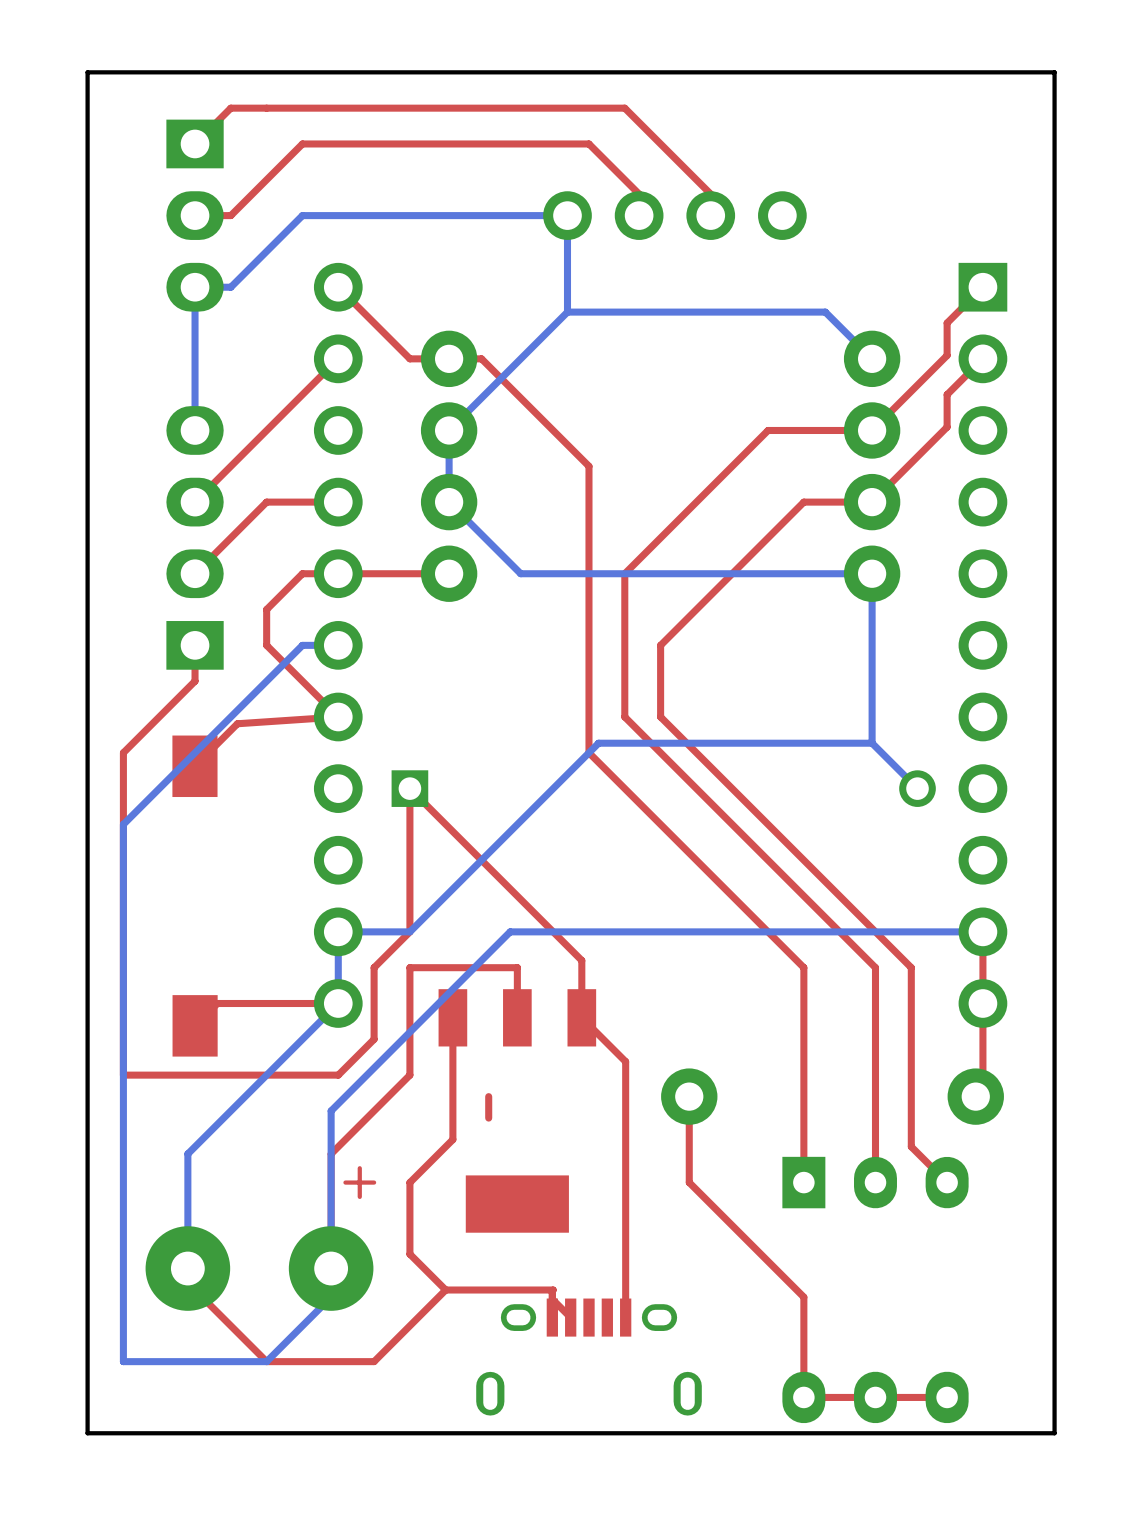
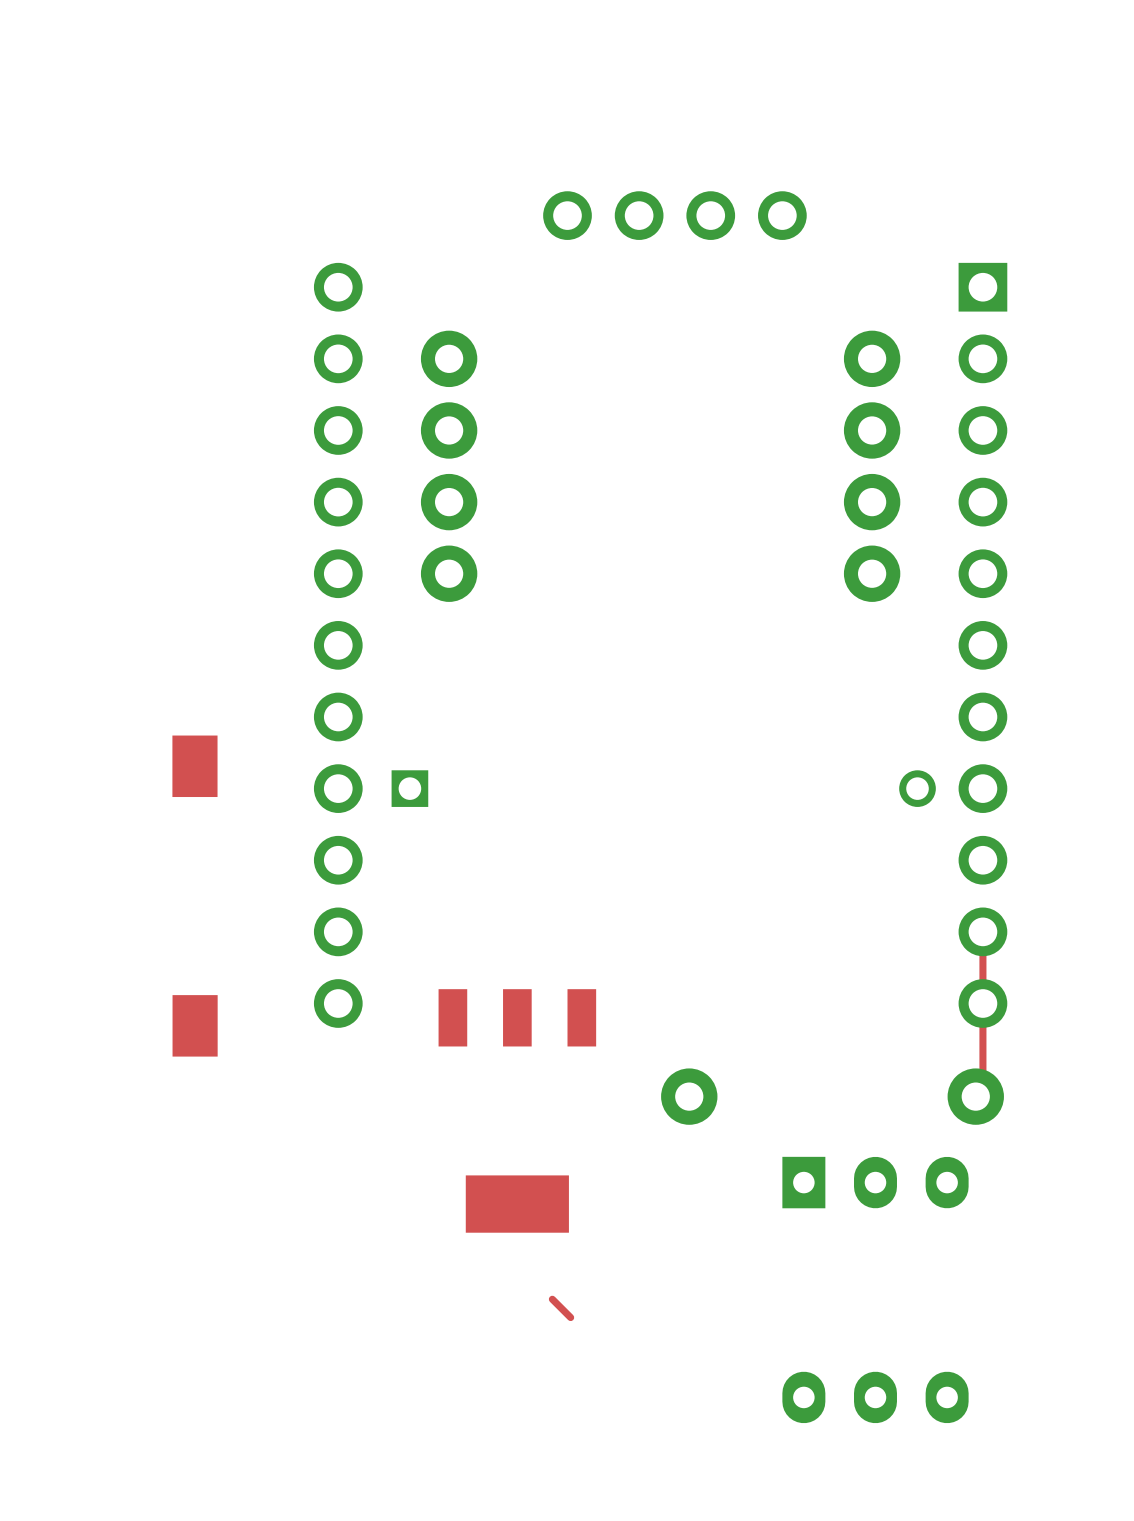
board edge: (1054, 72) (87, 72) (87, 1433) (1054, 1433) (1054, 72) -> none
top track: (195, 143) (230, 108) (624, 108) (710, 194) (710, 215) -> none
part: (195, 215) -> none
bottom track: (567, 215) (567, 312) -> none
bottom track: (567, 215) (302, 215) (230, 287) (195, 287) (195, 430) -> none
top track: (639, 215) (639, 194) (588, 143) (302, 143) (230, 215) (195, 215) -> none
top track: (338, 287) (409, 358) (481, 358) (588, 466) (588, 752) (803, 967) (803, 1182) -> none
top track: (965, 287) (982, 287) (947, 323) (947, 355) (872, 430) (768, 430) (624, 573) (624, 716) (875, 967) (875, 1182) -> none
bottom track: (567, 312) (825, 312) (872, 358) -> none
bottom track: (567, 312) (449, 430) (449, 502) (520, 573) (872, 573) (872, 743) -> none
top track: (338, 358) (195, 502) -> none
top track: (968, 358) (982, 358) (947, 394) (947, 427) (872, 502) (803, 502) (660, 645) (660, 716) (911, 967) (911, 1146) (947, 1182) -> none
top track: (338, 502) (266, 502) (195, 573) -> none
part: (195, 537) -> none
top track: (449, 573) (302, 573) (266, 609) (266, 645) (338, 716) (237, 723) (188, 773) -> none
top track: (195, 645) (195, 681) (123, 752) (123, 1075) (338, 1075) (374, 1039) (374, 967) (409, 931) (409, 788) (581, 960) (581, 1017) (625, 1061) (625, 1317) -> none
bottom track: (338, 645) (302, 645) (123, 824) (123, 1361) (266, 1361) (331, 1297) (331, 1110) (510, 931) (982, 931) -> none
bottom track: (872, 743) (598, 743) (409, 931) (338, 931) (338, 1003) (187, 1153) (187, 1268) -> none
bottom track: (872, 743) (917, 788) -> none
top track: (338, 1003) (217, 1003) (195, 1025) -> none
top track: (452, 1017) (452, 1139) (409, 1182) (409, 1254) (445, 1290) -> none
top track: (517, 1017) (517, 967) (409, 967) (409, 1075) (331, 1153) (331, 1268) -> none
top track: (488, 1096) (488, 1118) -> none
top track: (689, 1096) (689, 1182) (803, 1297) (803, 1397) (947, 1397) -> none
part: (260, 1238) -> none
top track: (187, 1268) (187, 1282) (266, 1361) (374, 1361) (445, 1290) -> none
top track: (445, 1290) (553, 1290) (552, 1317) -> none
part: (589, 1357) -> none

